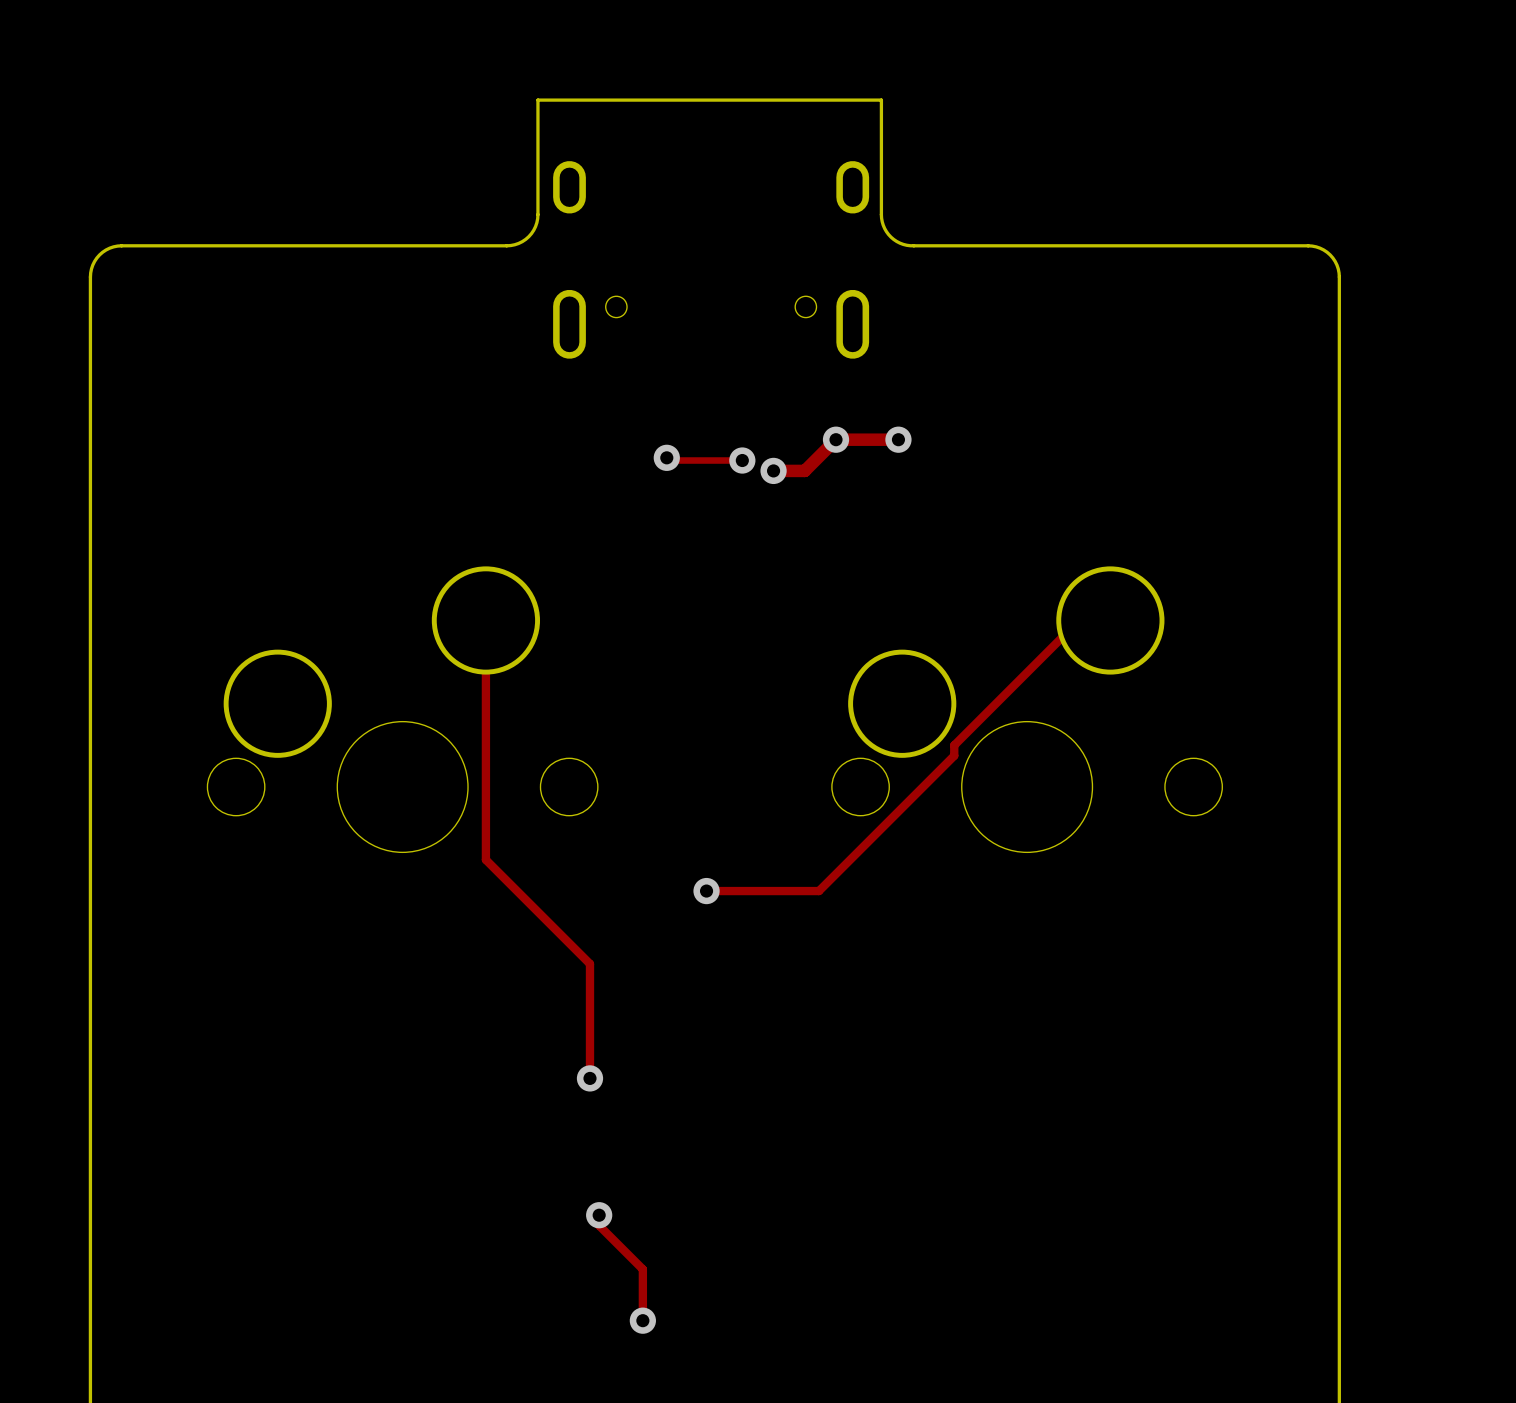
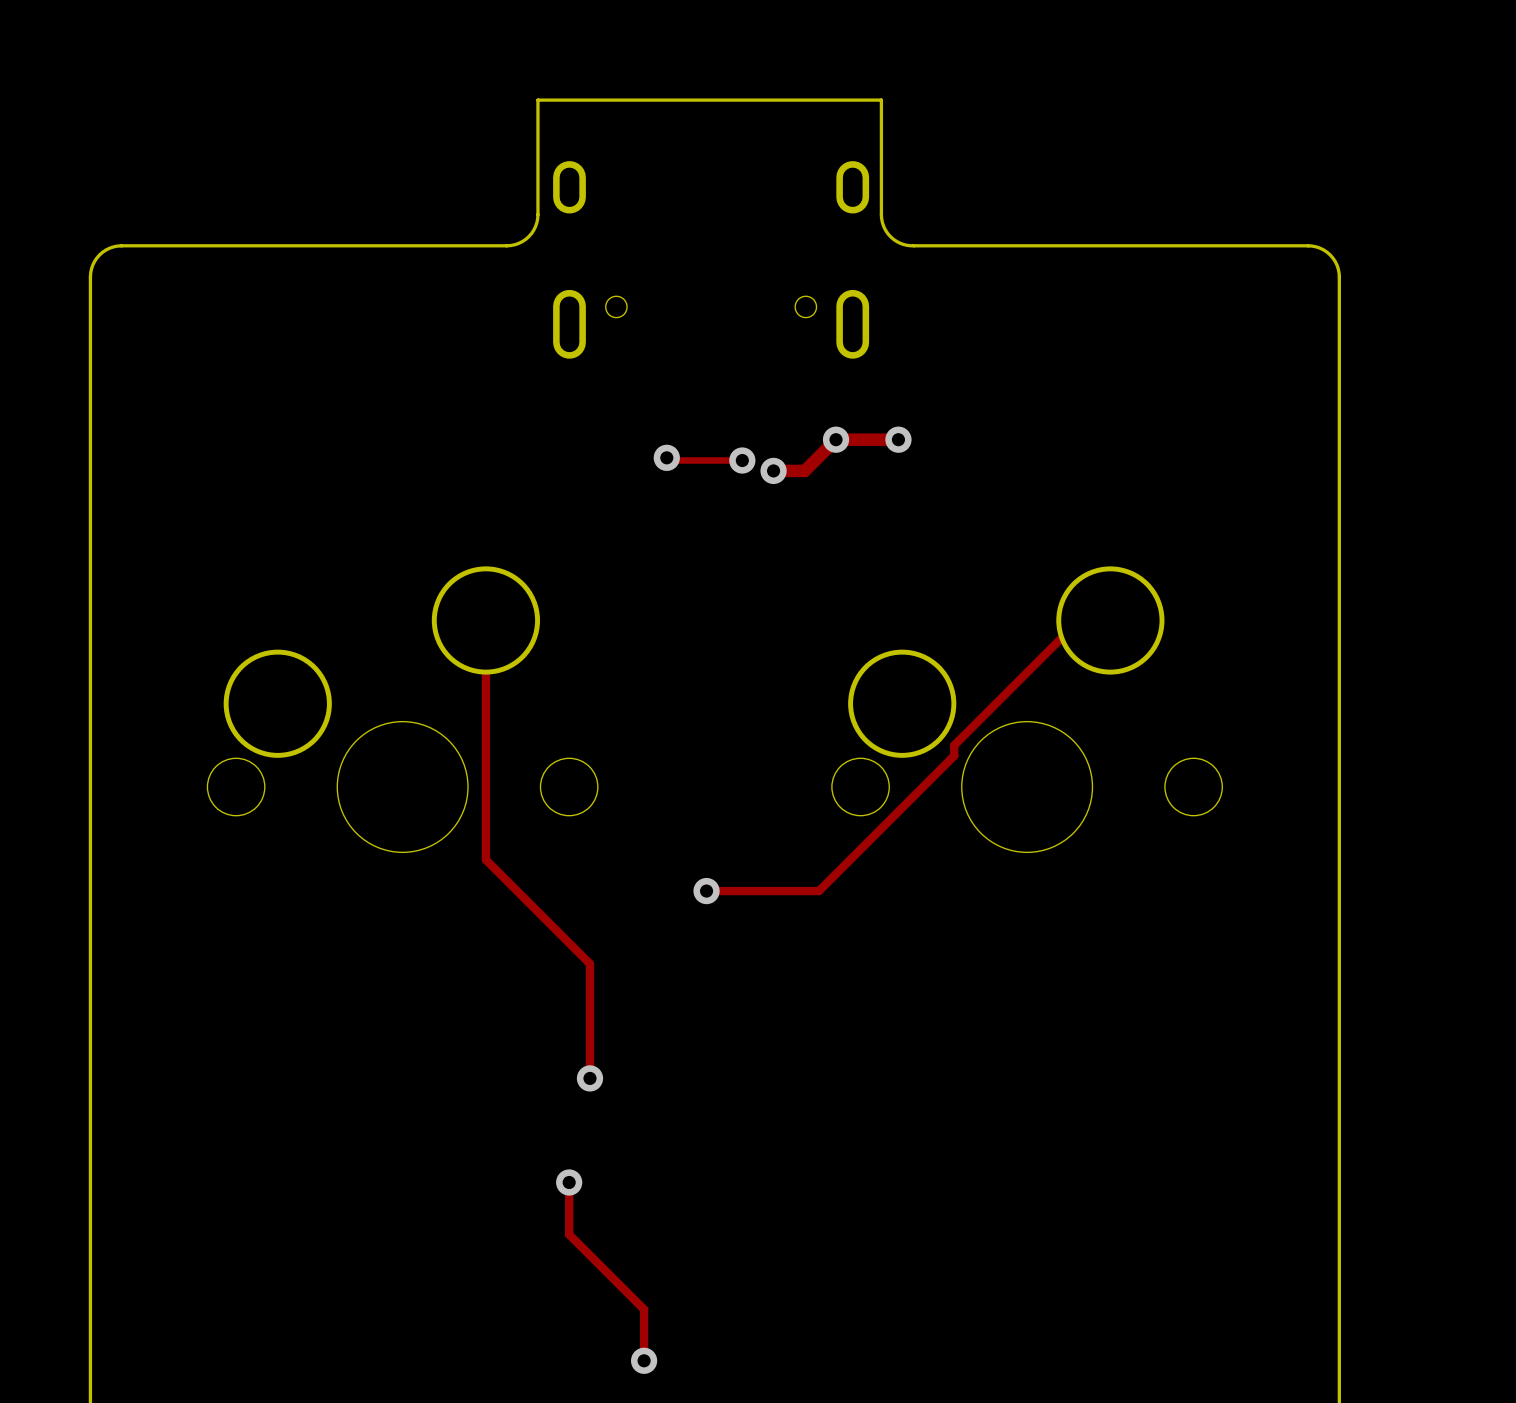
track: none -> (569, 1182) (569, 1234) (644, 1309) (644, 1360)
track: (599, 1215) (599, 1225) (642, 1269) (642, 1320) -> none
via position: (599, 1215) -> (569, 1182)
via position: (642, 1320) -> (644, 1360)

